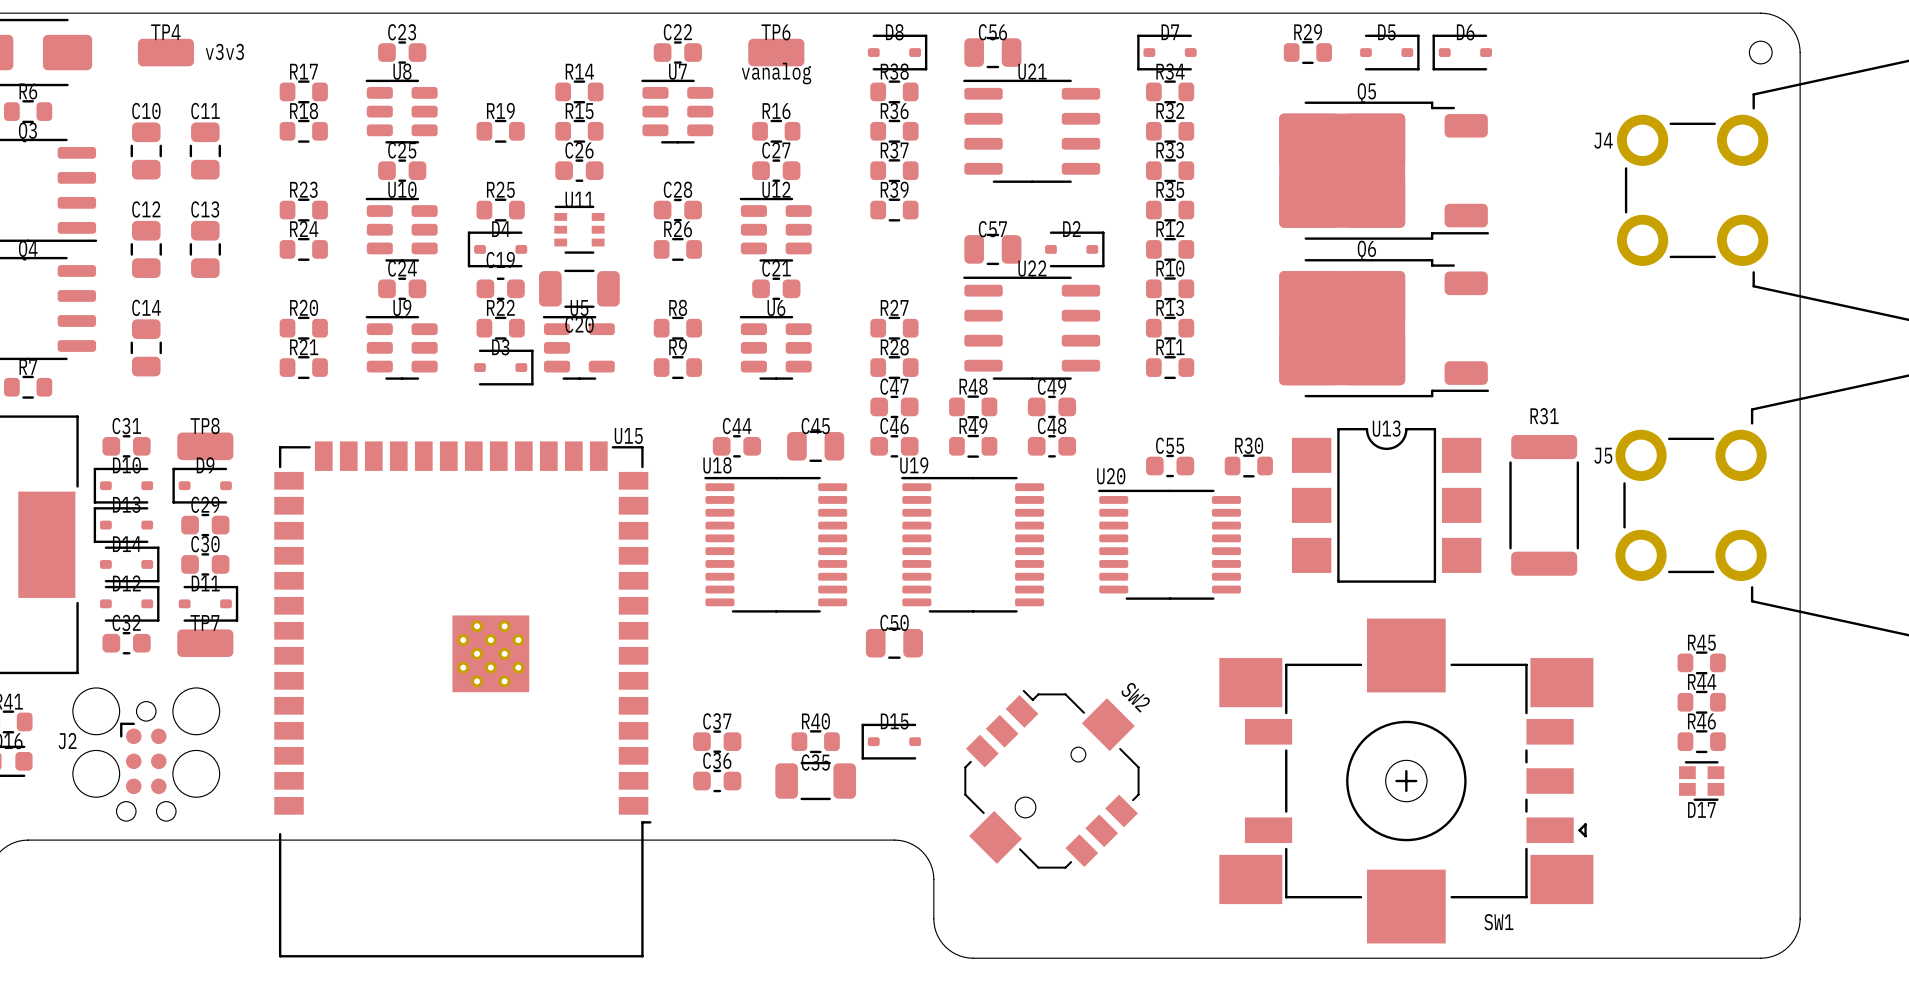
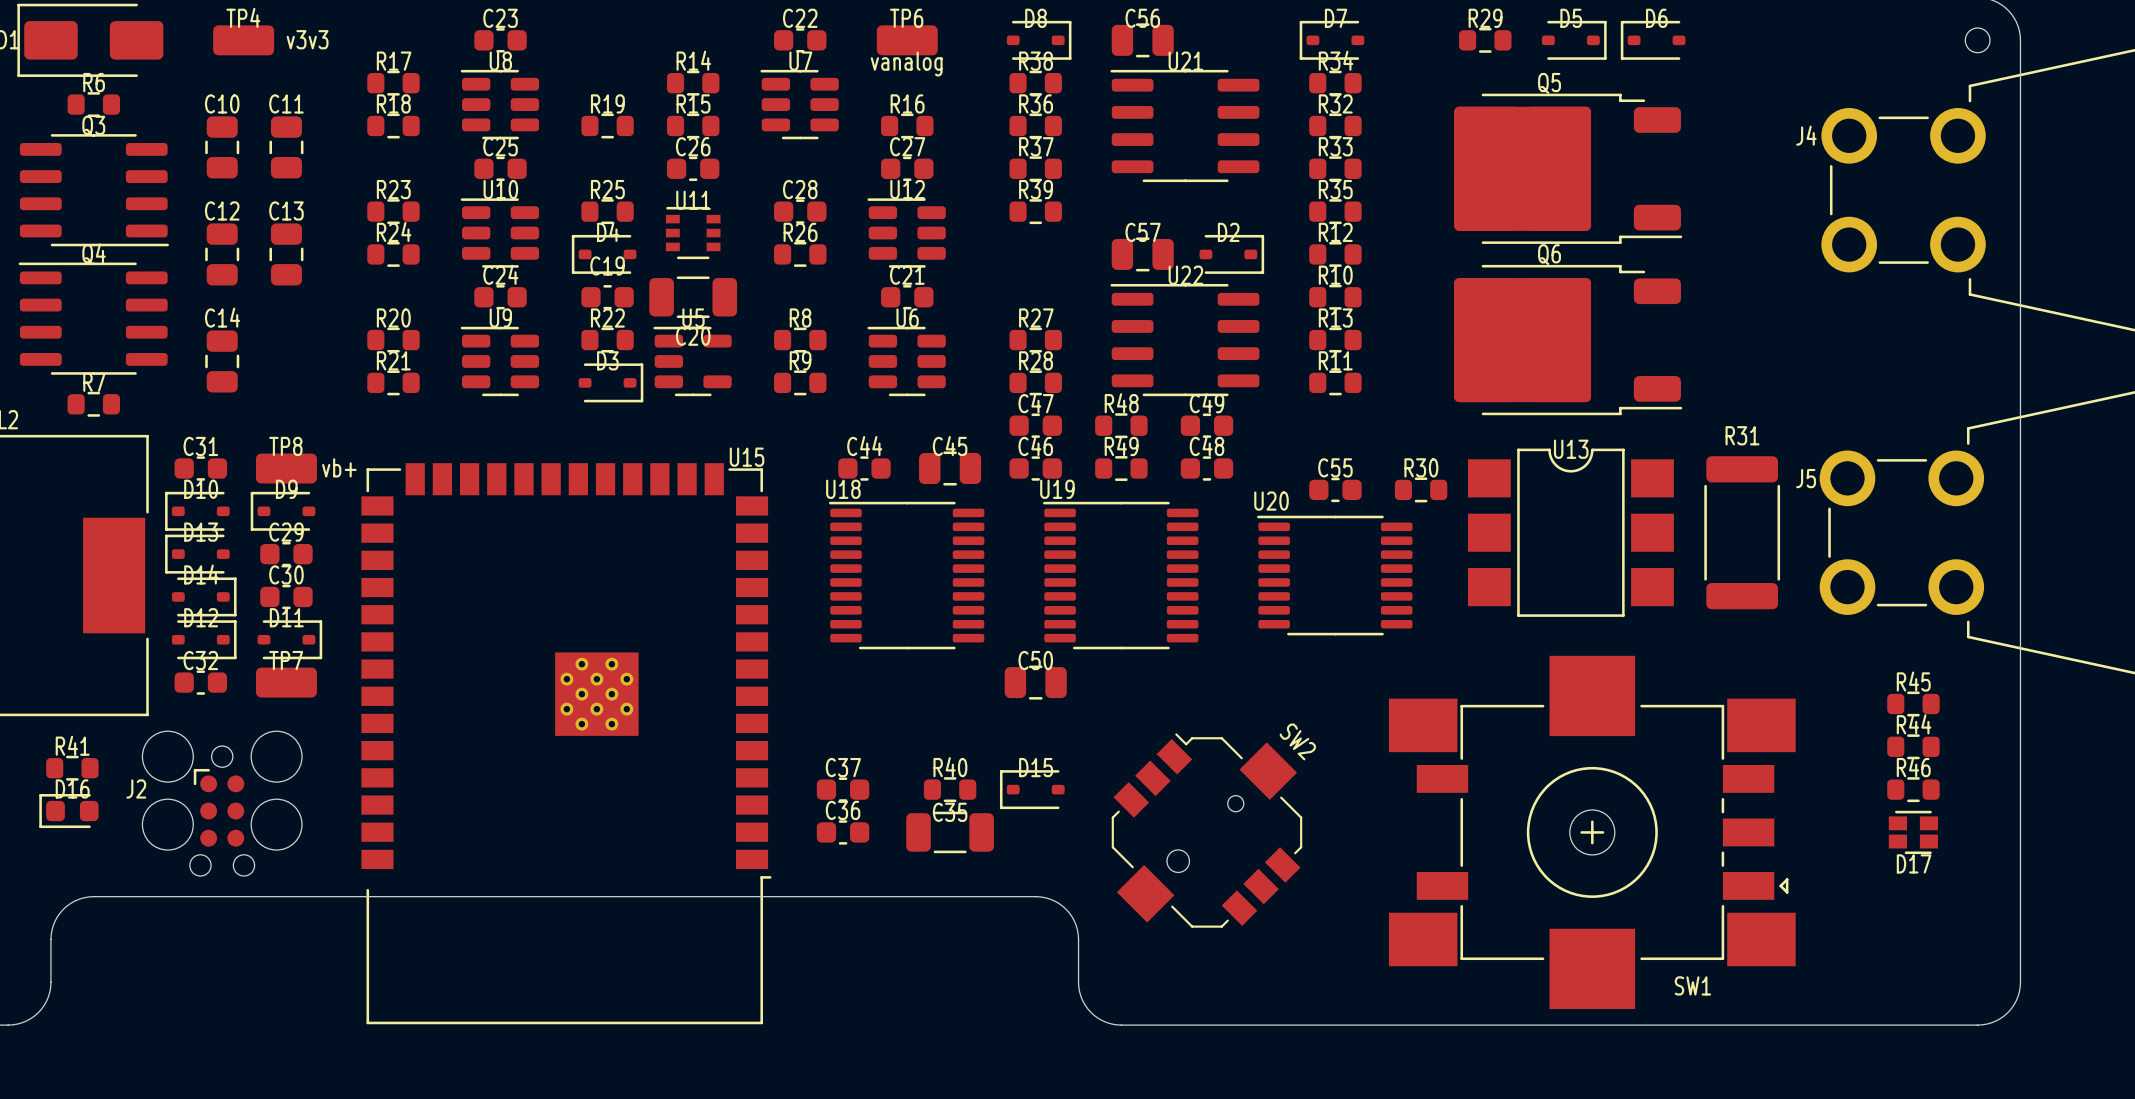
TP8 value: none -> vb+ (339, 467)

